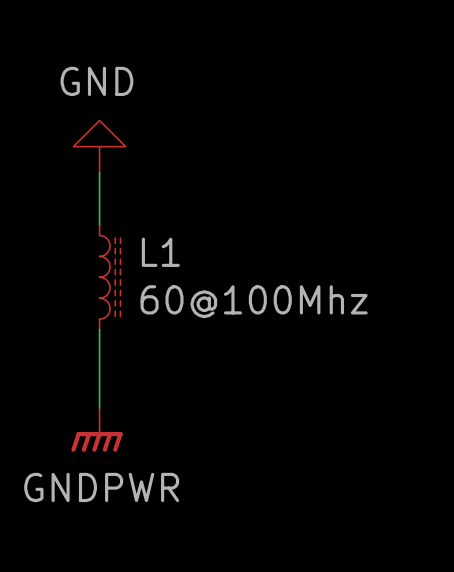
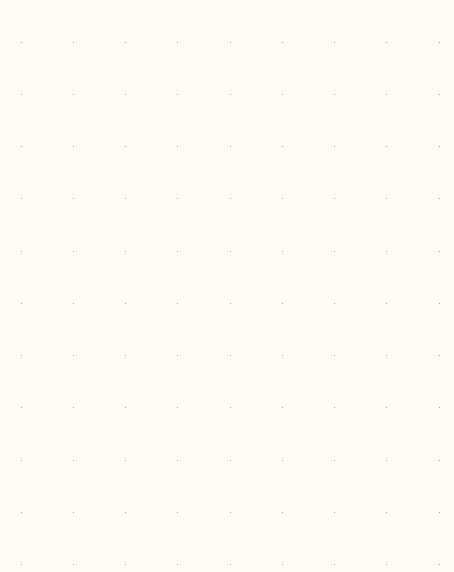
power symbol: GND (99, 146) -> none
wire: (99, 172) (99, 225) -> none
L1: 60@100Mhz (110, 277) -> none
wire: (99, 329) (99, 407) -> none
power symbol: GNDPWR (96, 429) -> none

